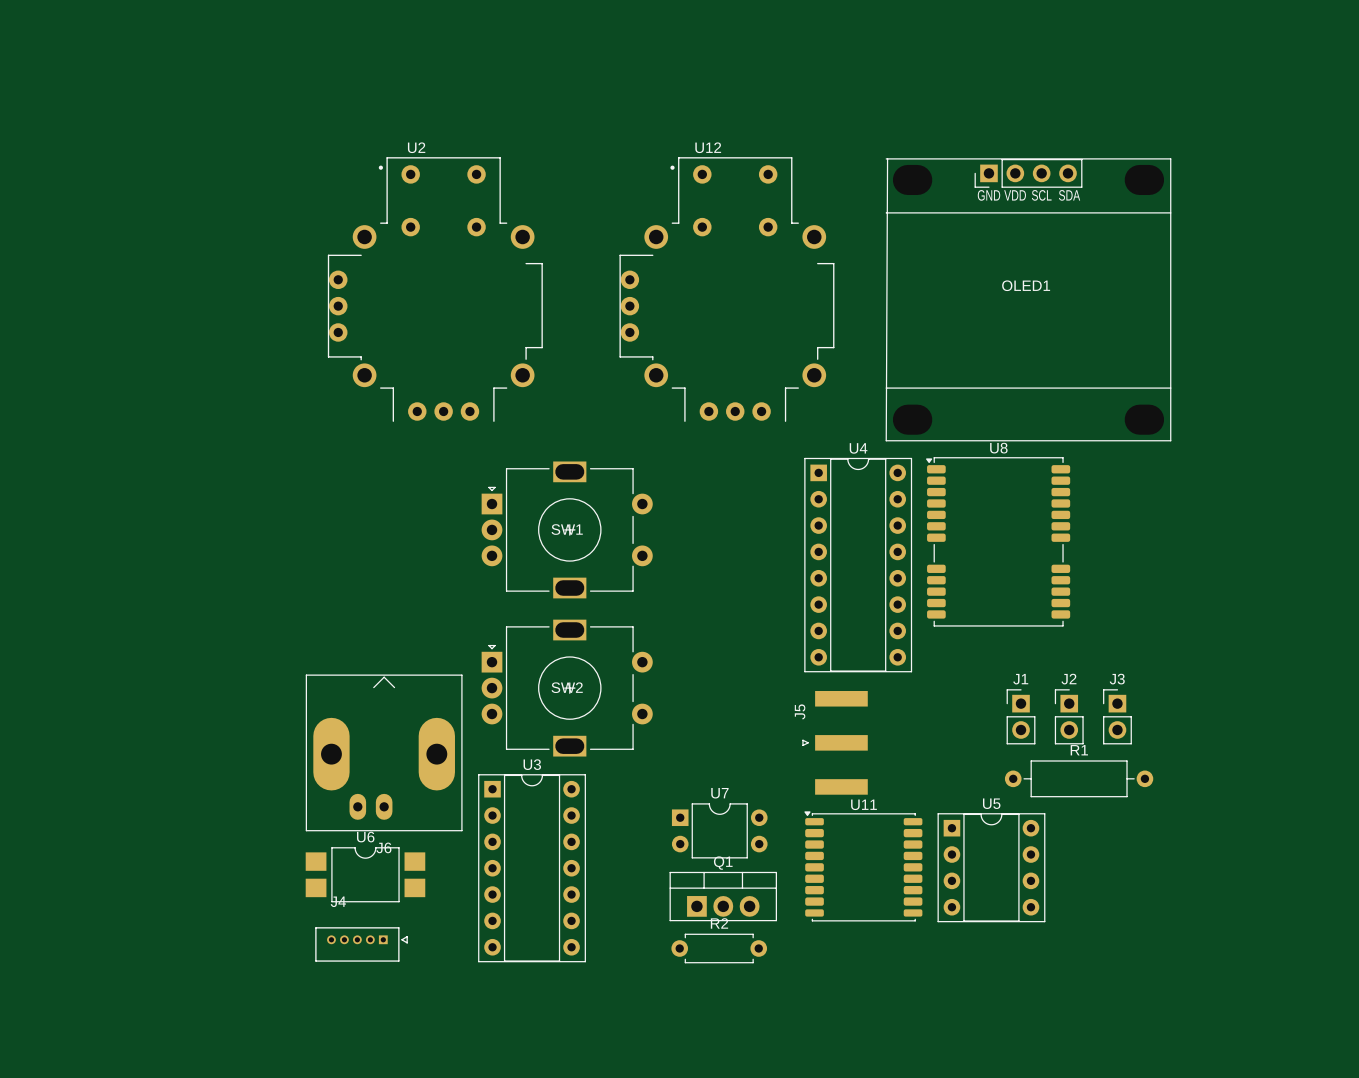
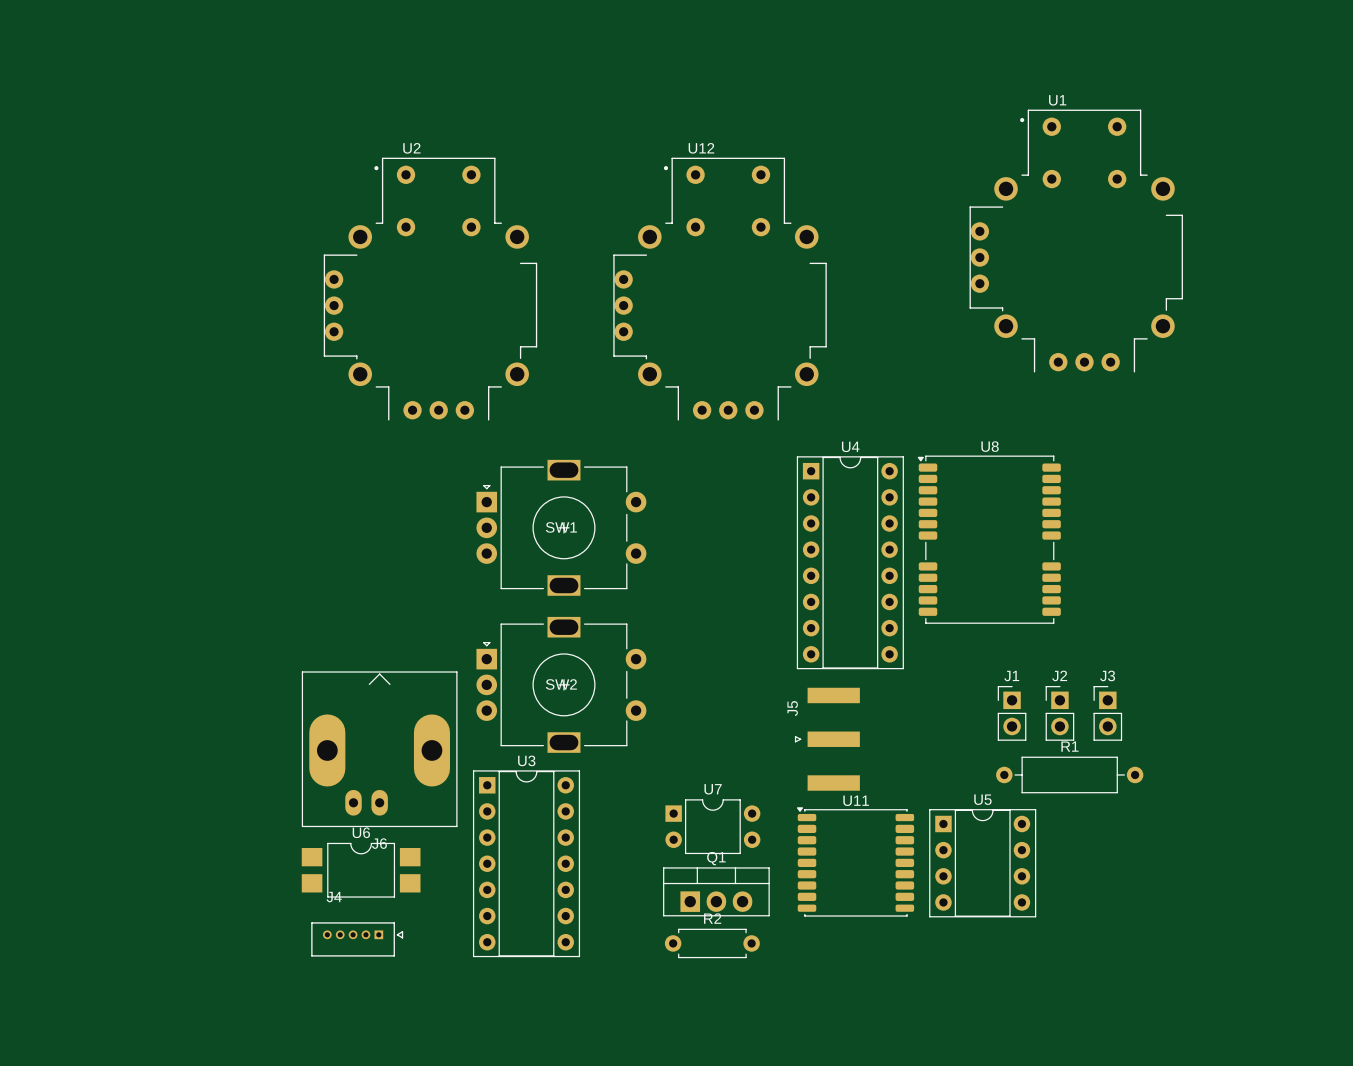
U1: none -> (1076, 241)
OLED1: (1028, 299) -> none

